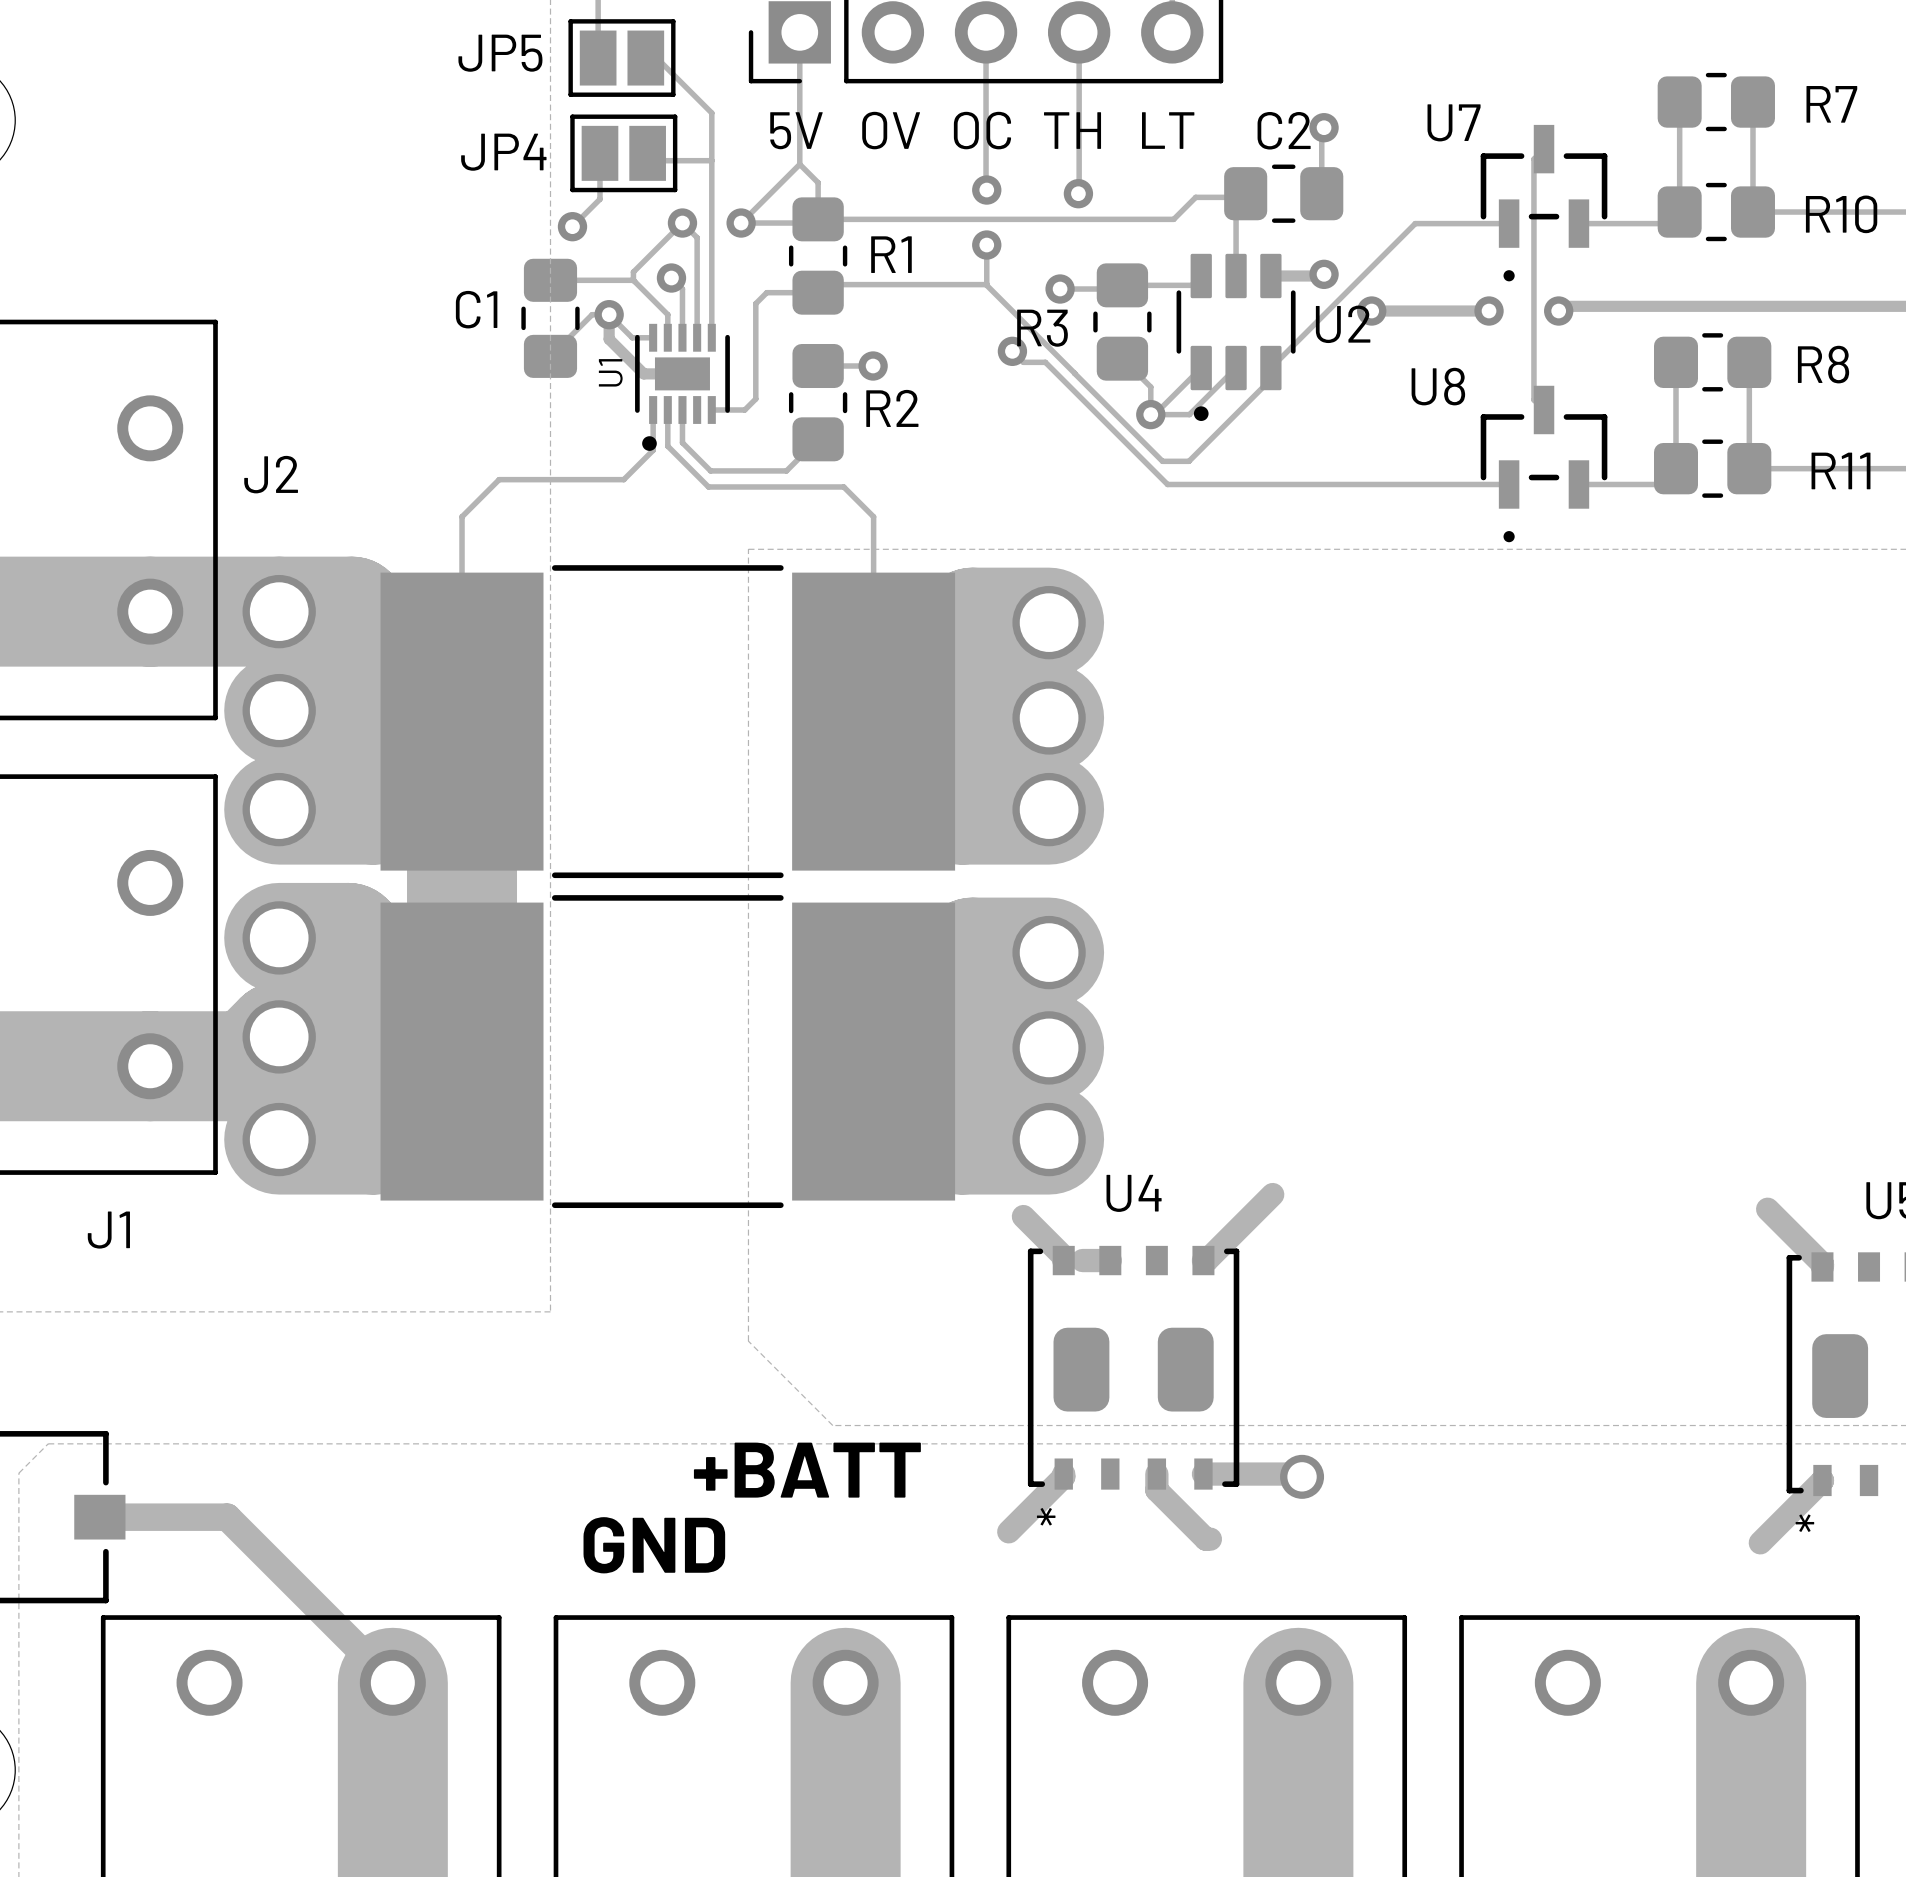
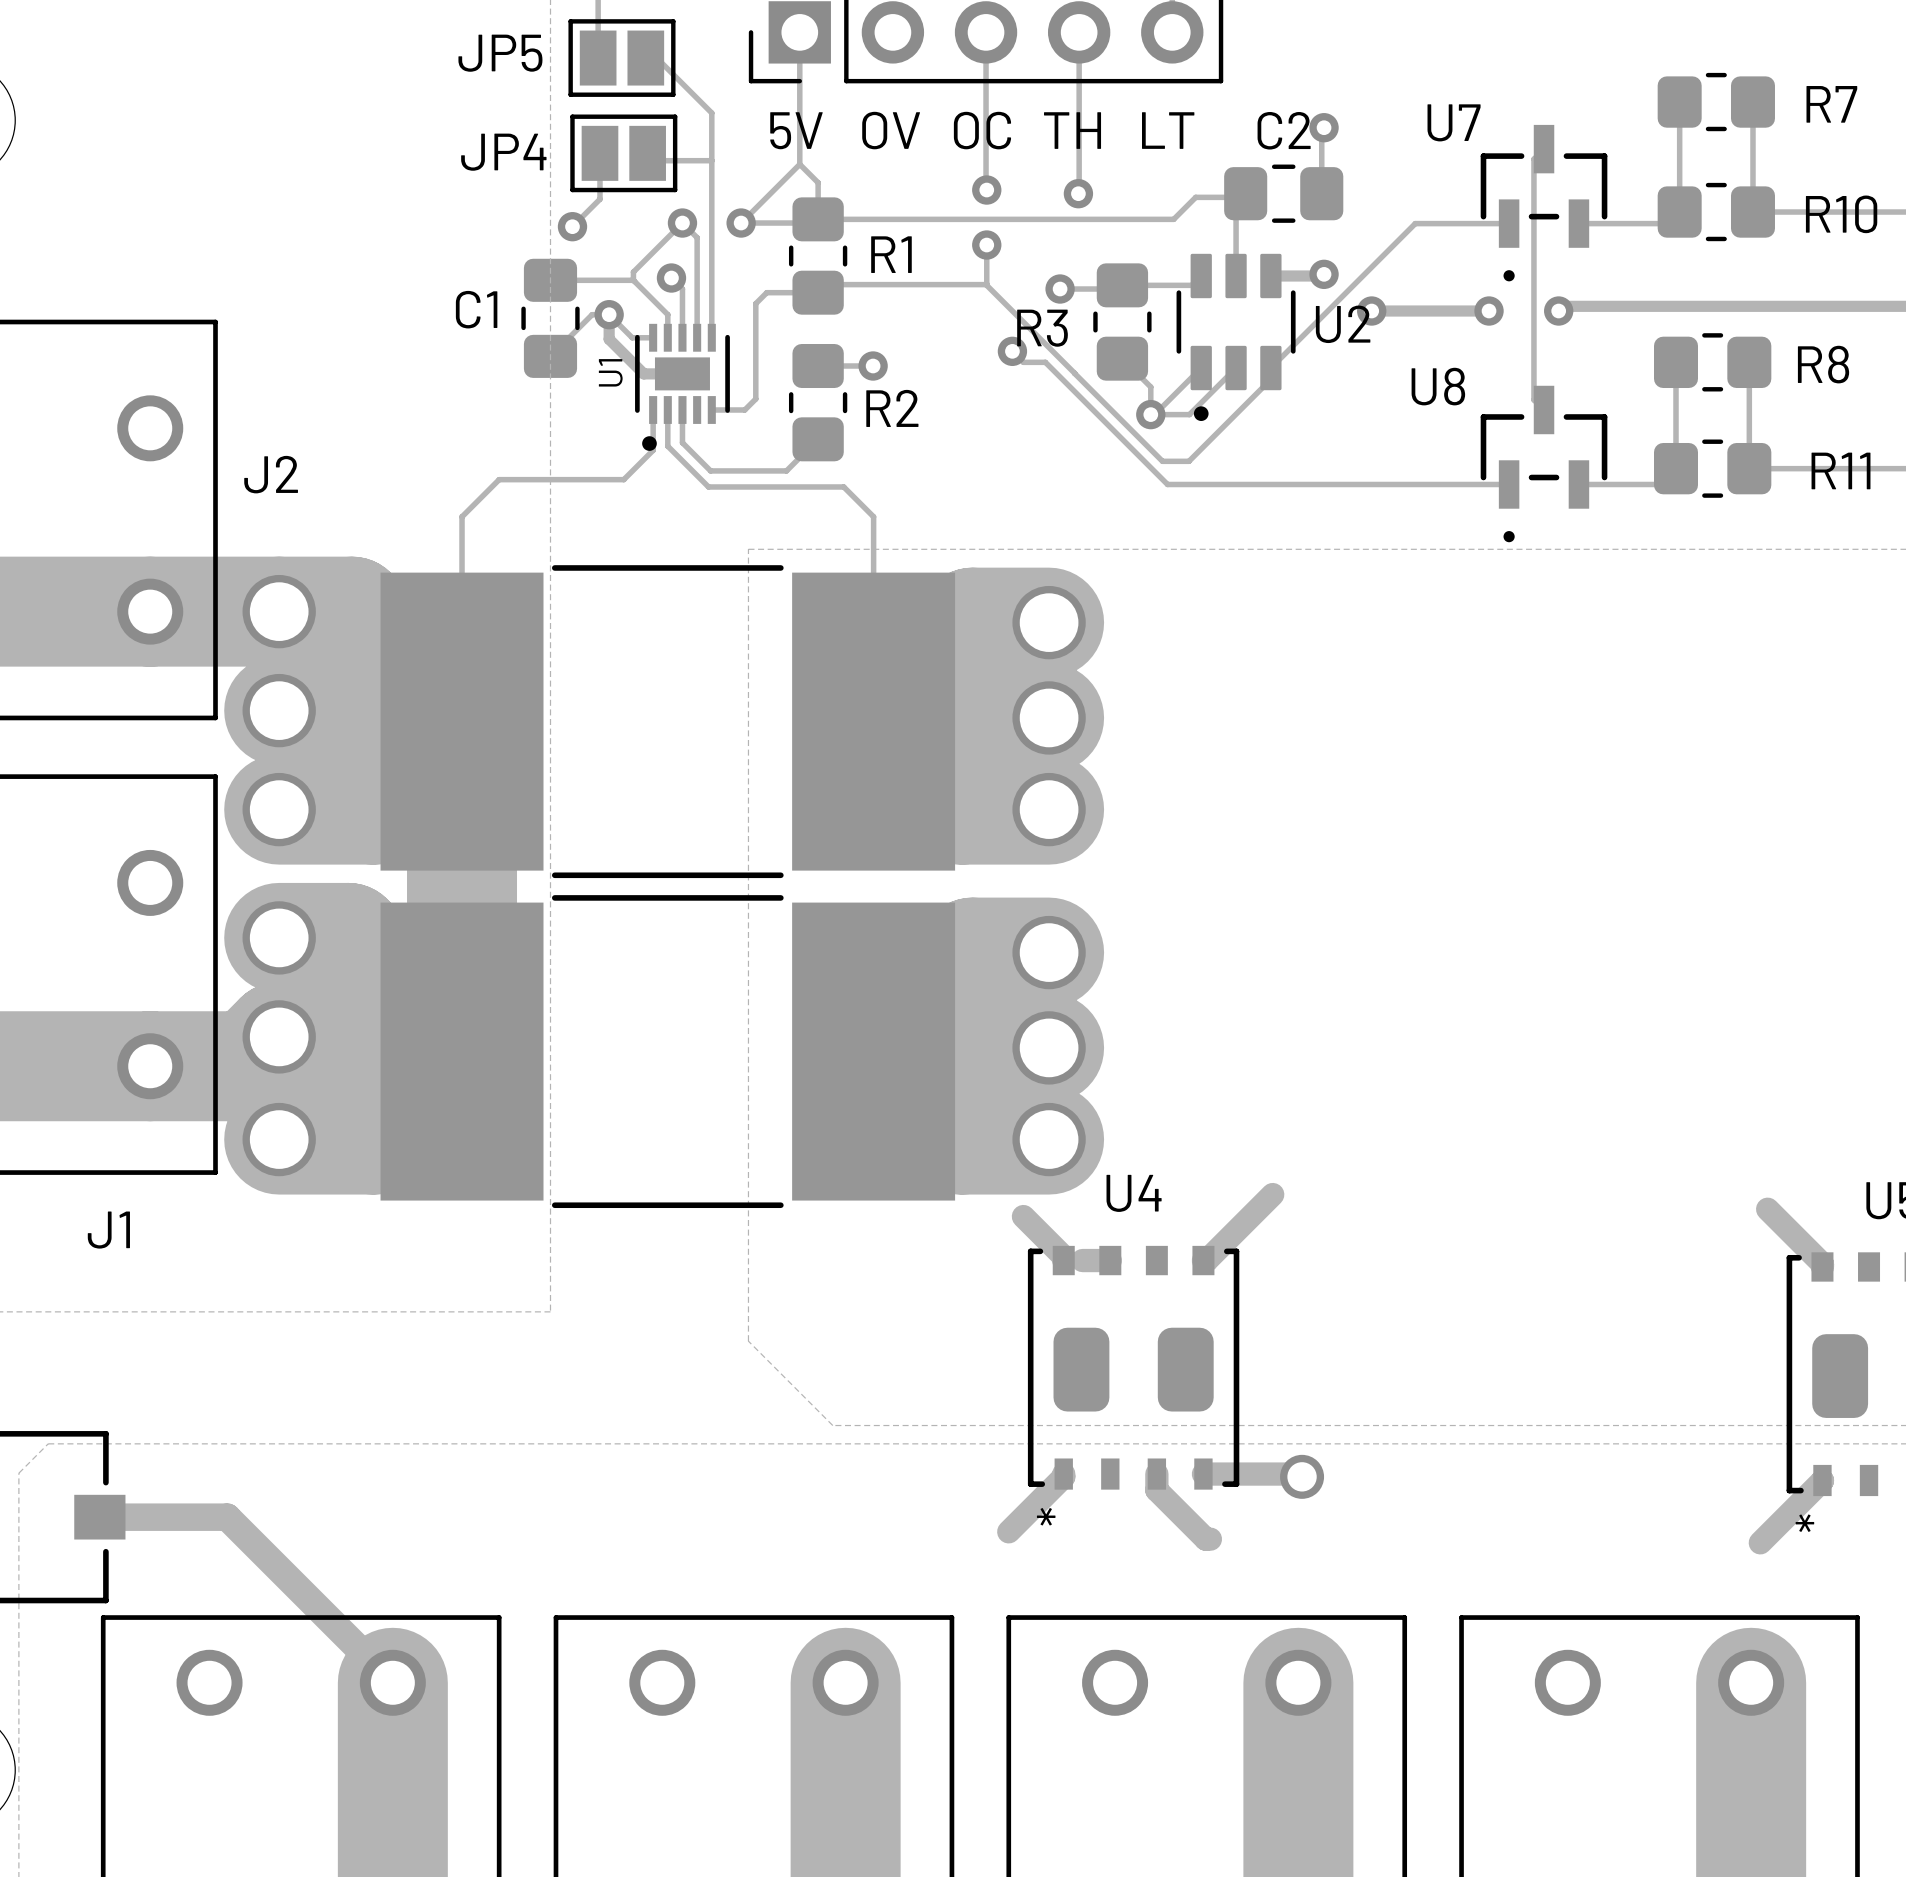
text: +BATT (807, 1470) -> none
text: GND (654, 1545) -> none

